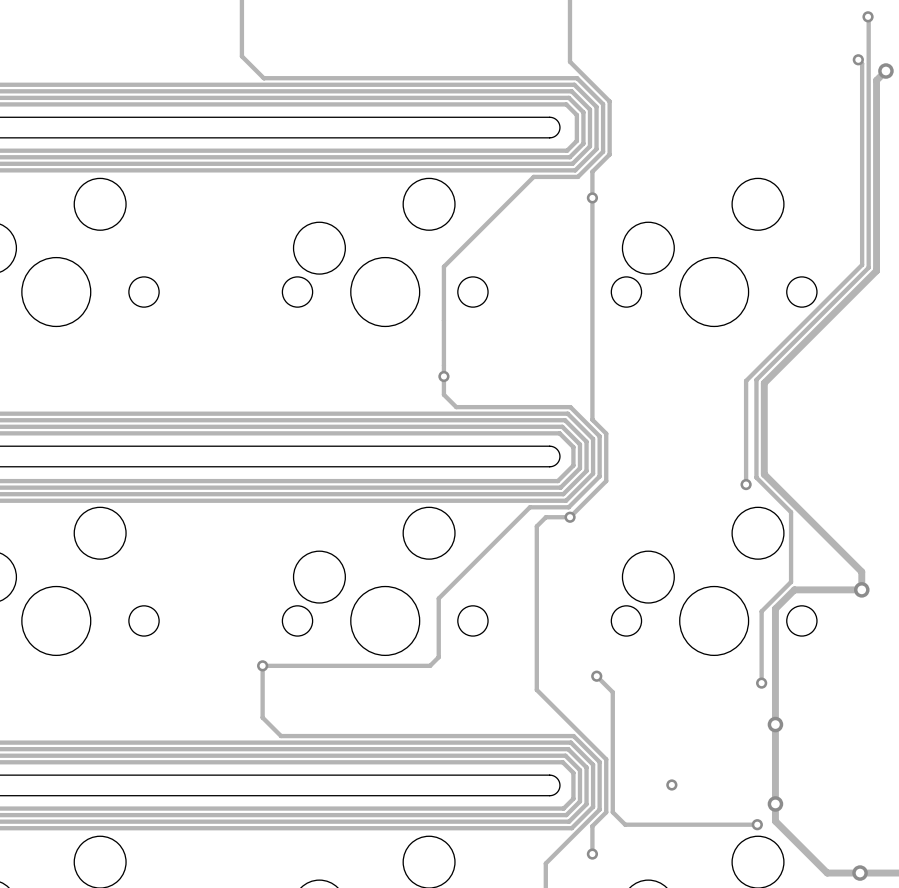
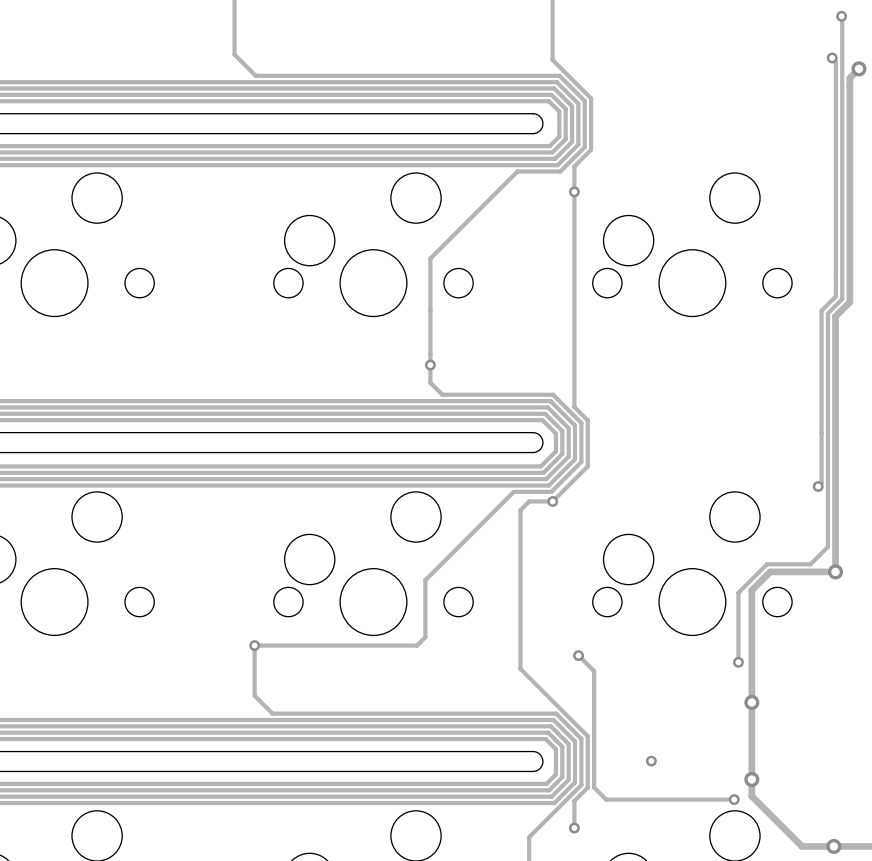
track: (862, 264) (746, 380) (746, 484) -> (835, 256) (835, 296) (821, 310) (821, 483) (818, 486)
track: (868, 267) (756, 379) (756, 477) (791, 512) (791, 582) -> (842, 259) (842, 299) (827, 313) (827, 546) (810, 564) (766, 564)
track: (876, 270) (764, 383) (764, 474) (861, 571) -> (849, 262) (849, 302) (835, 316) (835, 554)
via position: (746, 484) -> (818, 486)

